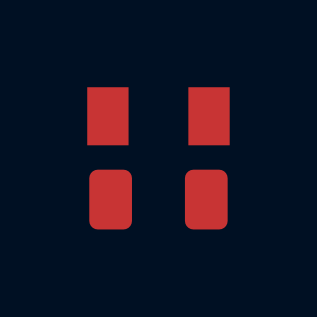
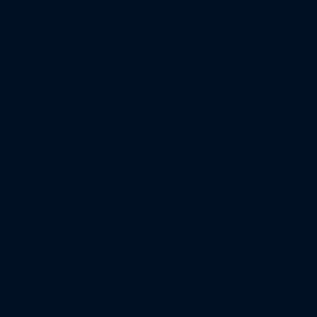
part: (158, 116) -> none
part: (158, 199) -> none

